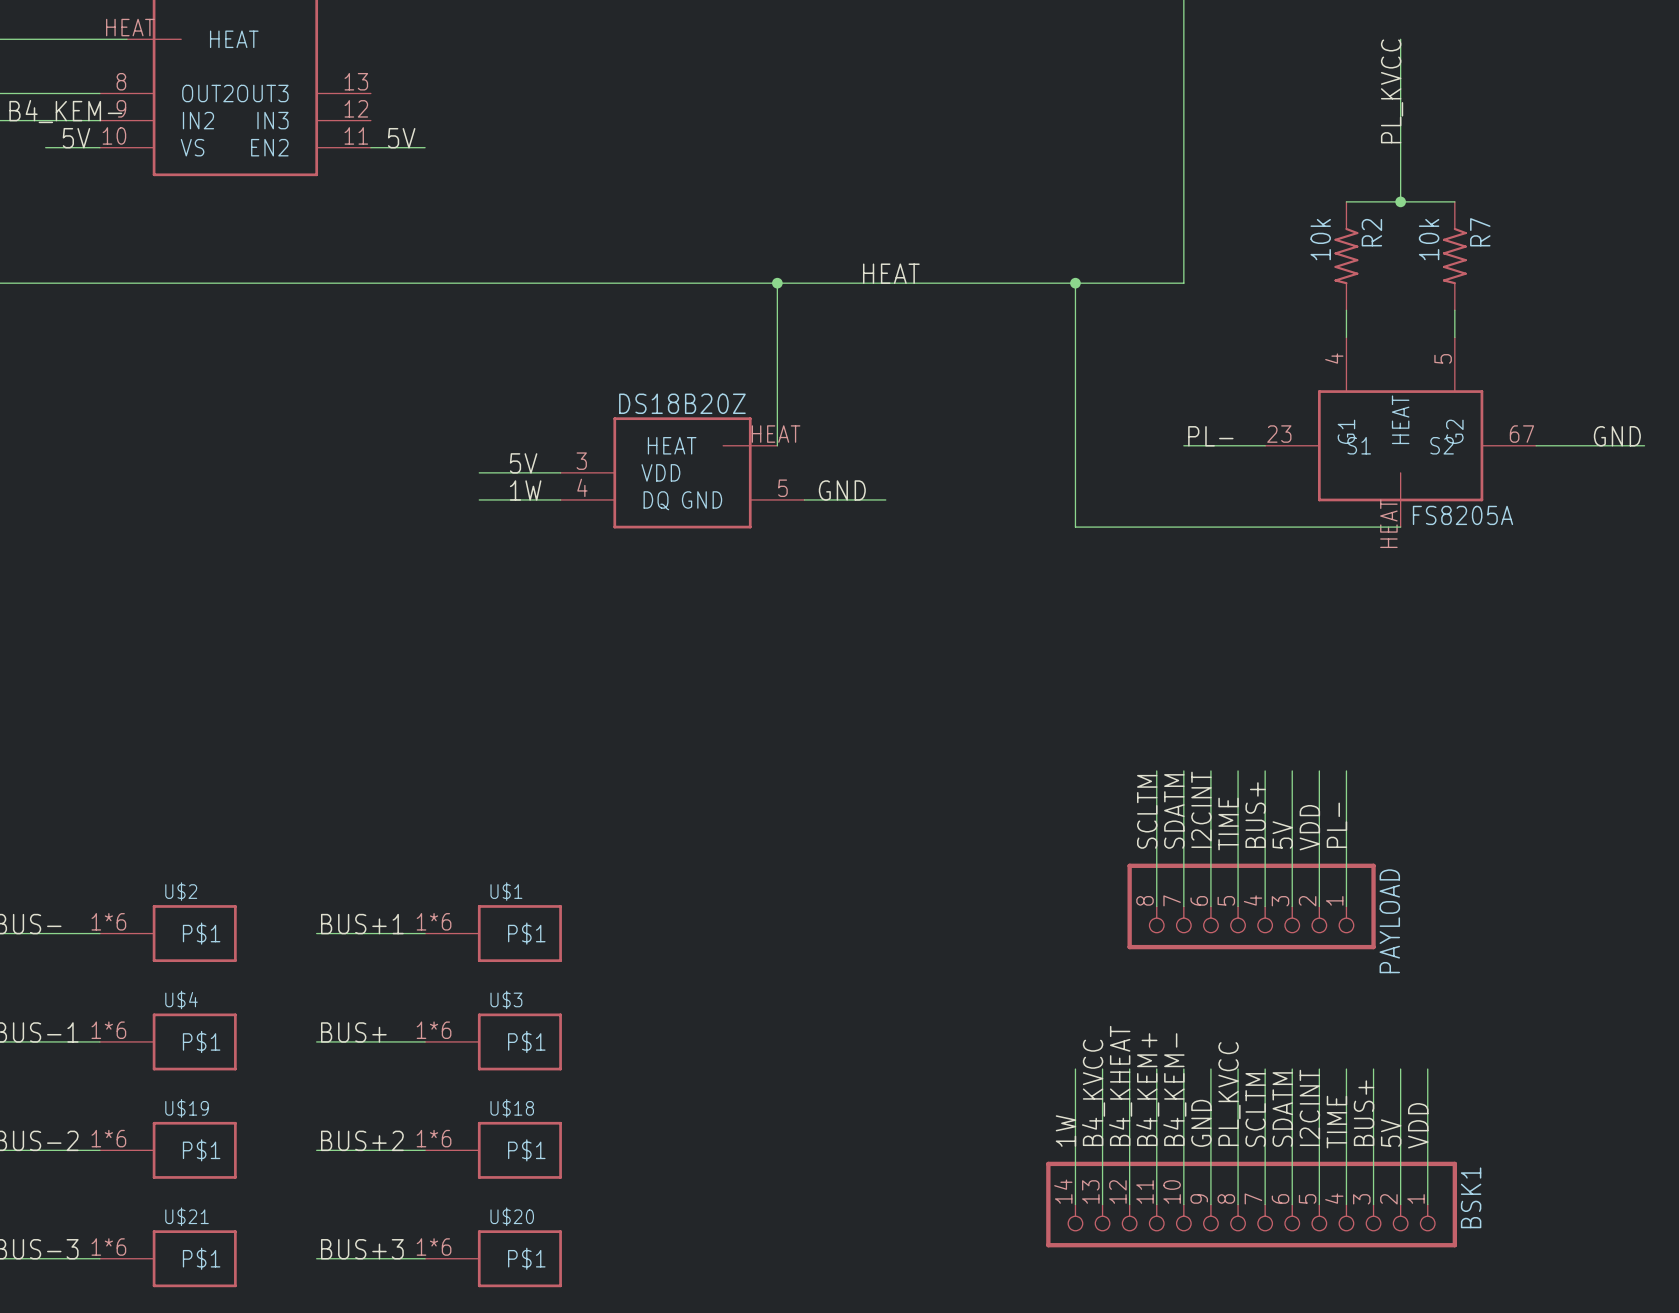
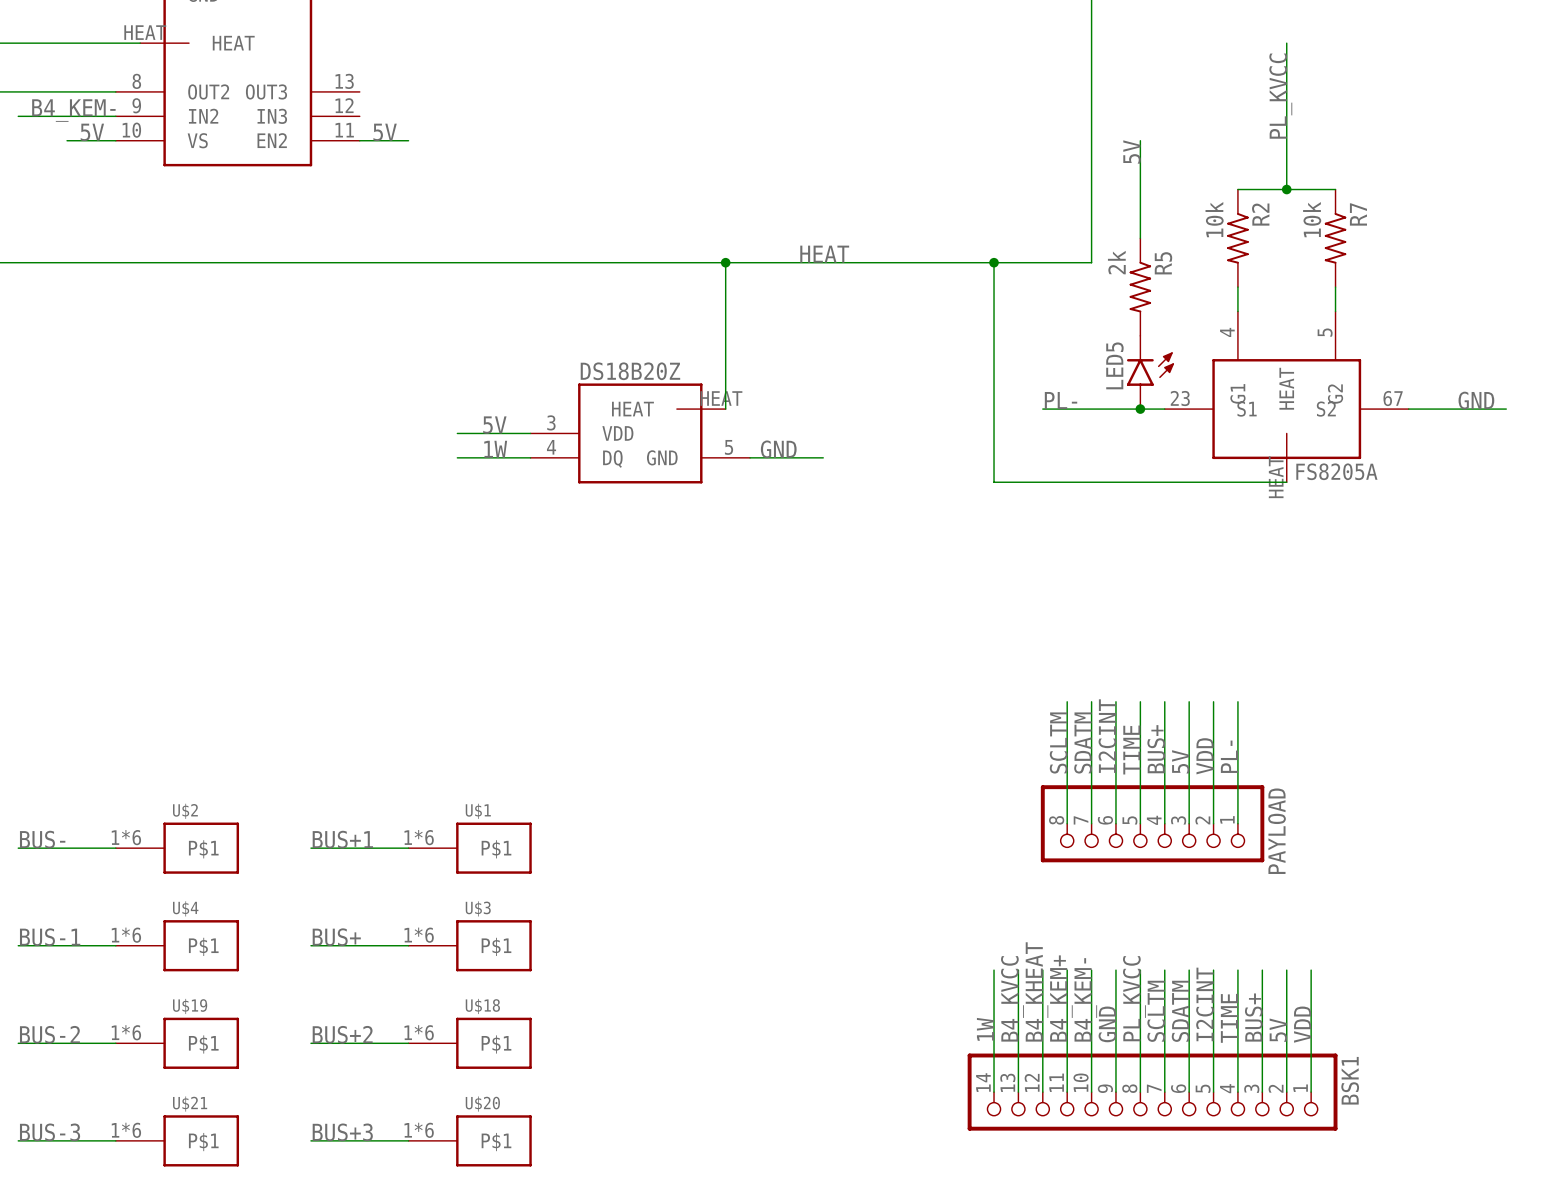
wire: none -> (1140, 140) (1140, 238)
label: none -> 5V (1132, 151)
R5: none -> 2k (1140, 287)
LED5: none -> (1150, 372)
label position: PL- (1210, 436) -> PL- (1061, 400)
wire: none -> (1042, 409) (1091, 409)
junction: none -> (1140, 409)

